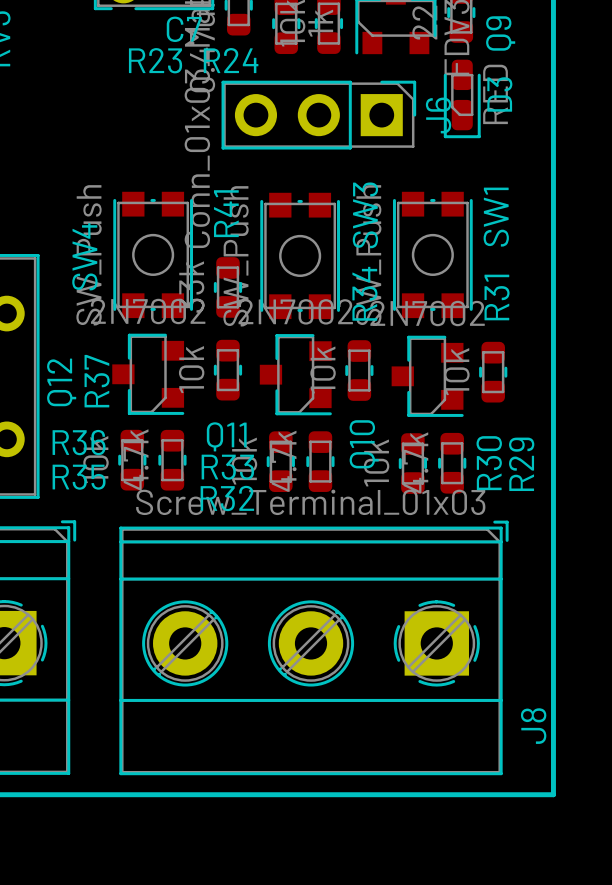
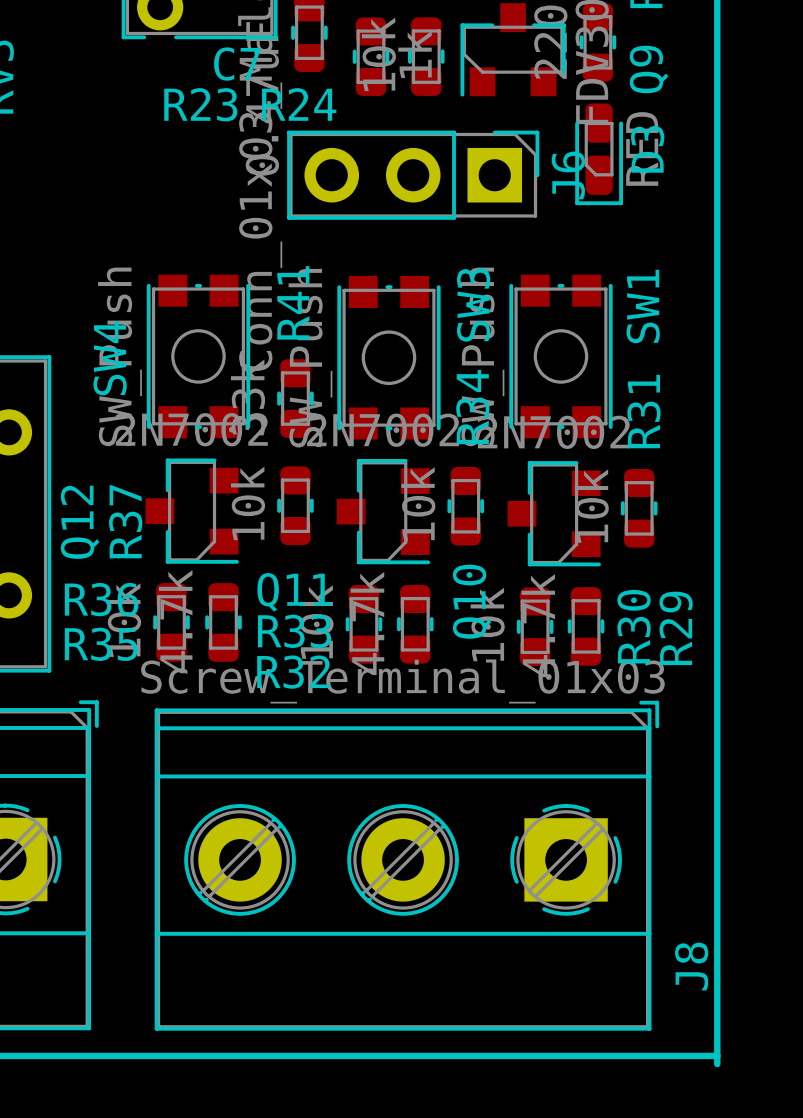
line: none -> (717, 1055) (717, 1064)

